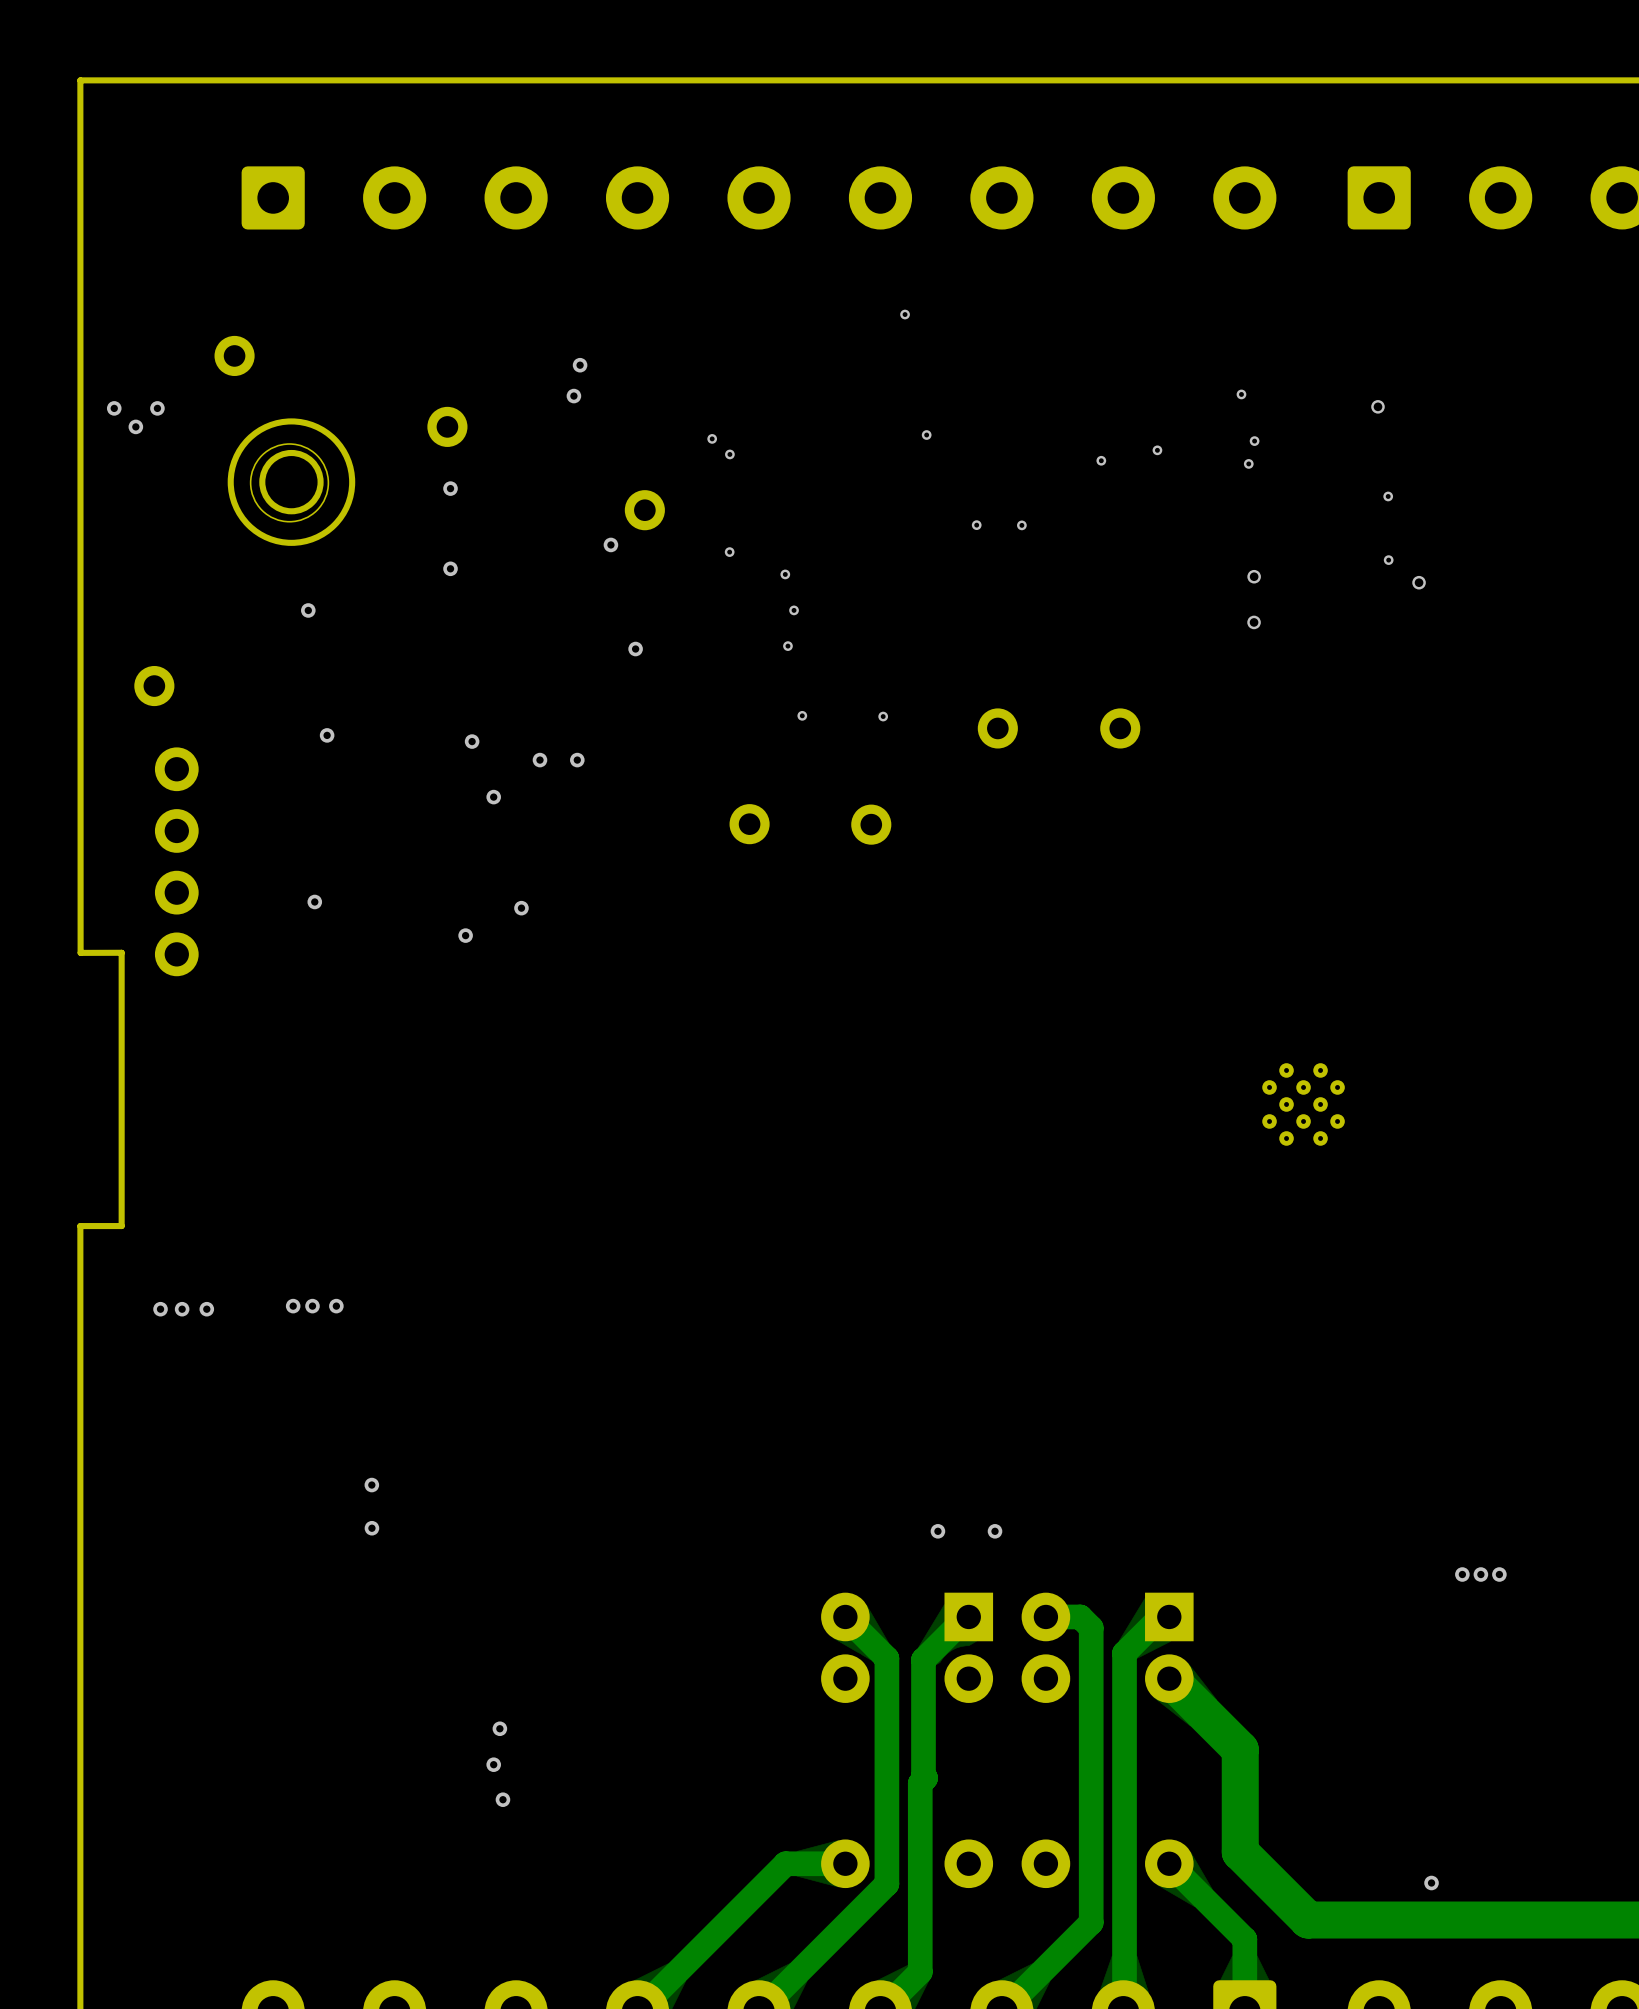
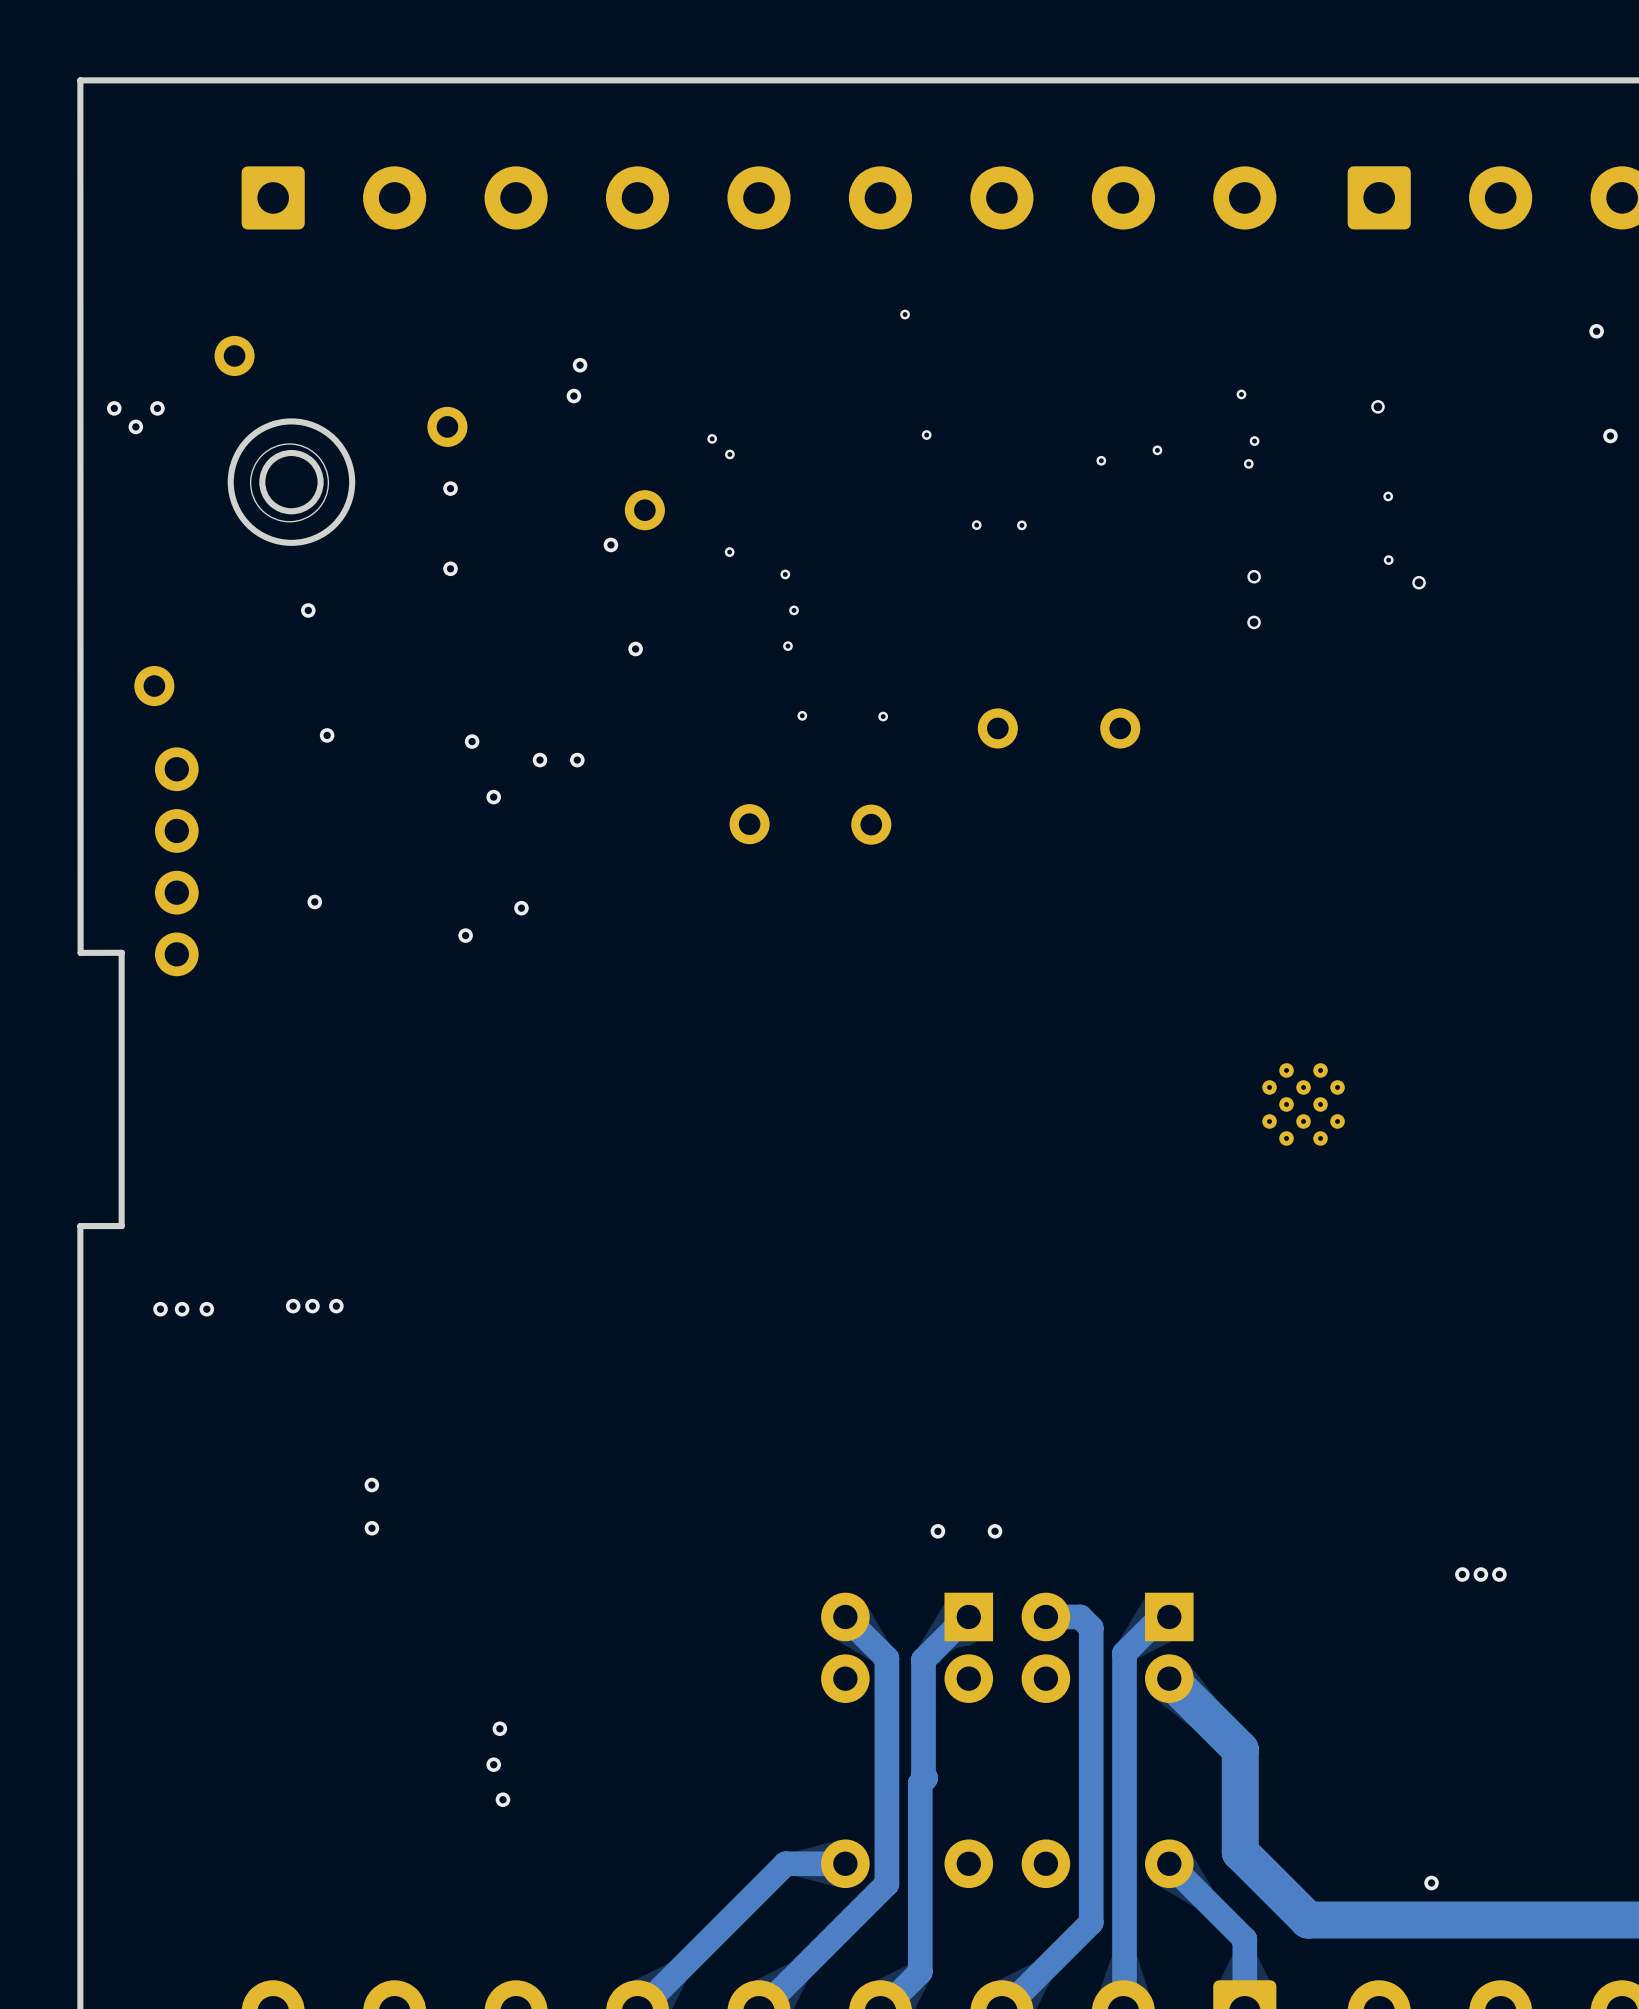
via: none -> (1596, 331)
via: none -> (1610, 435)

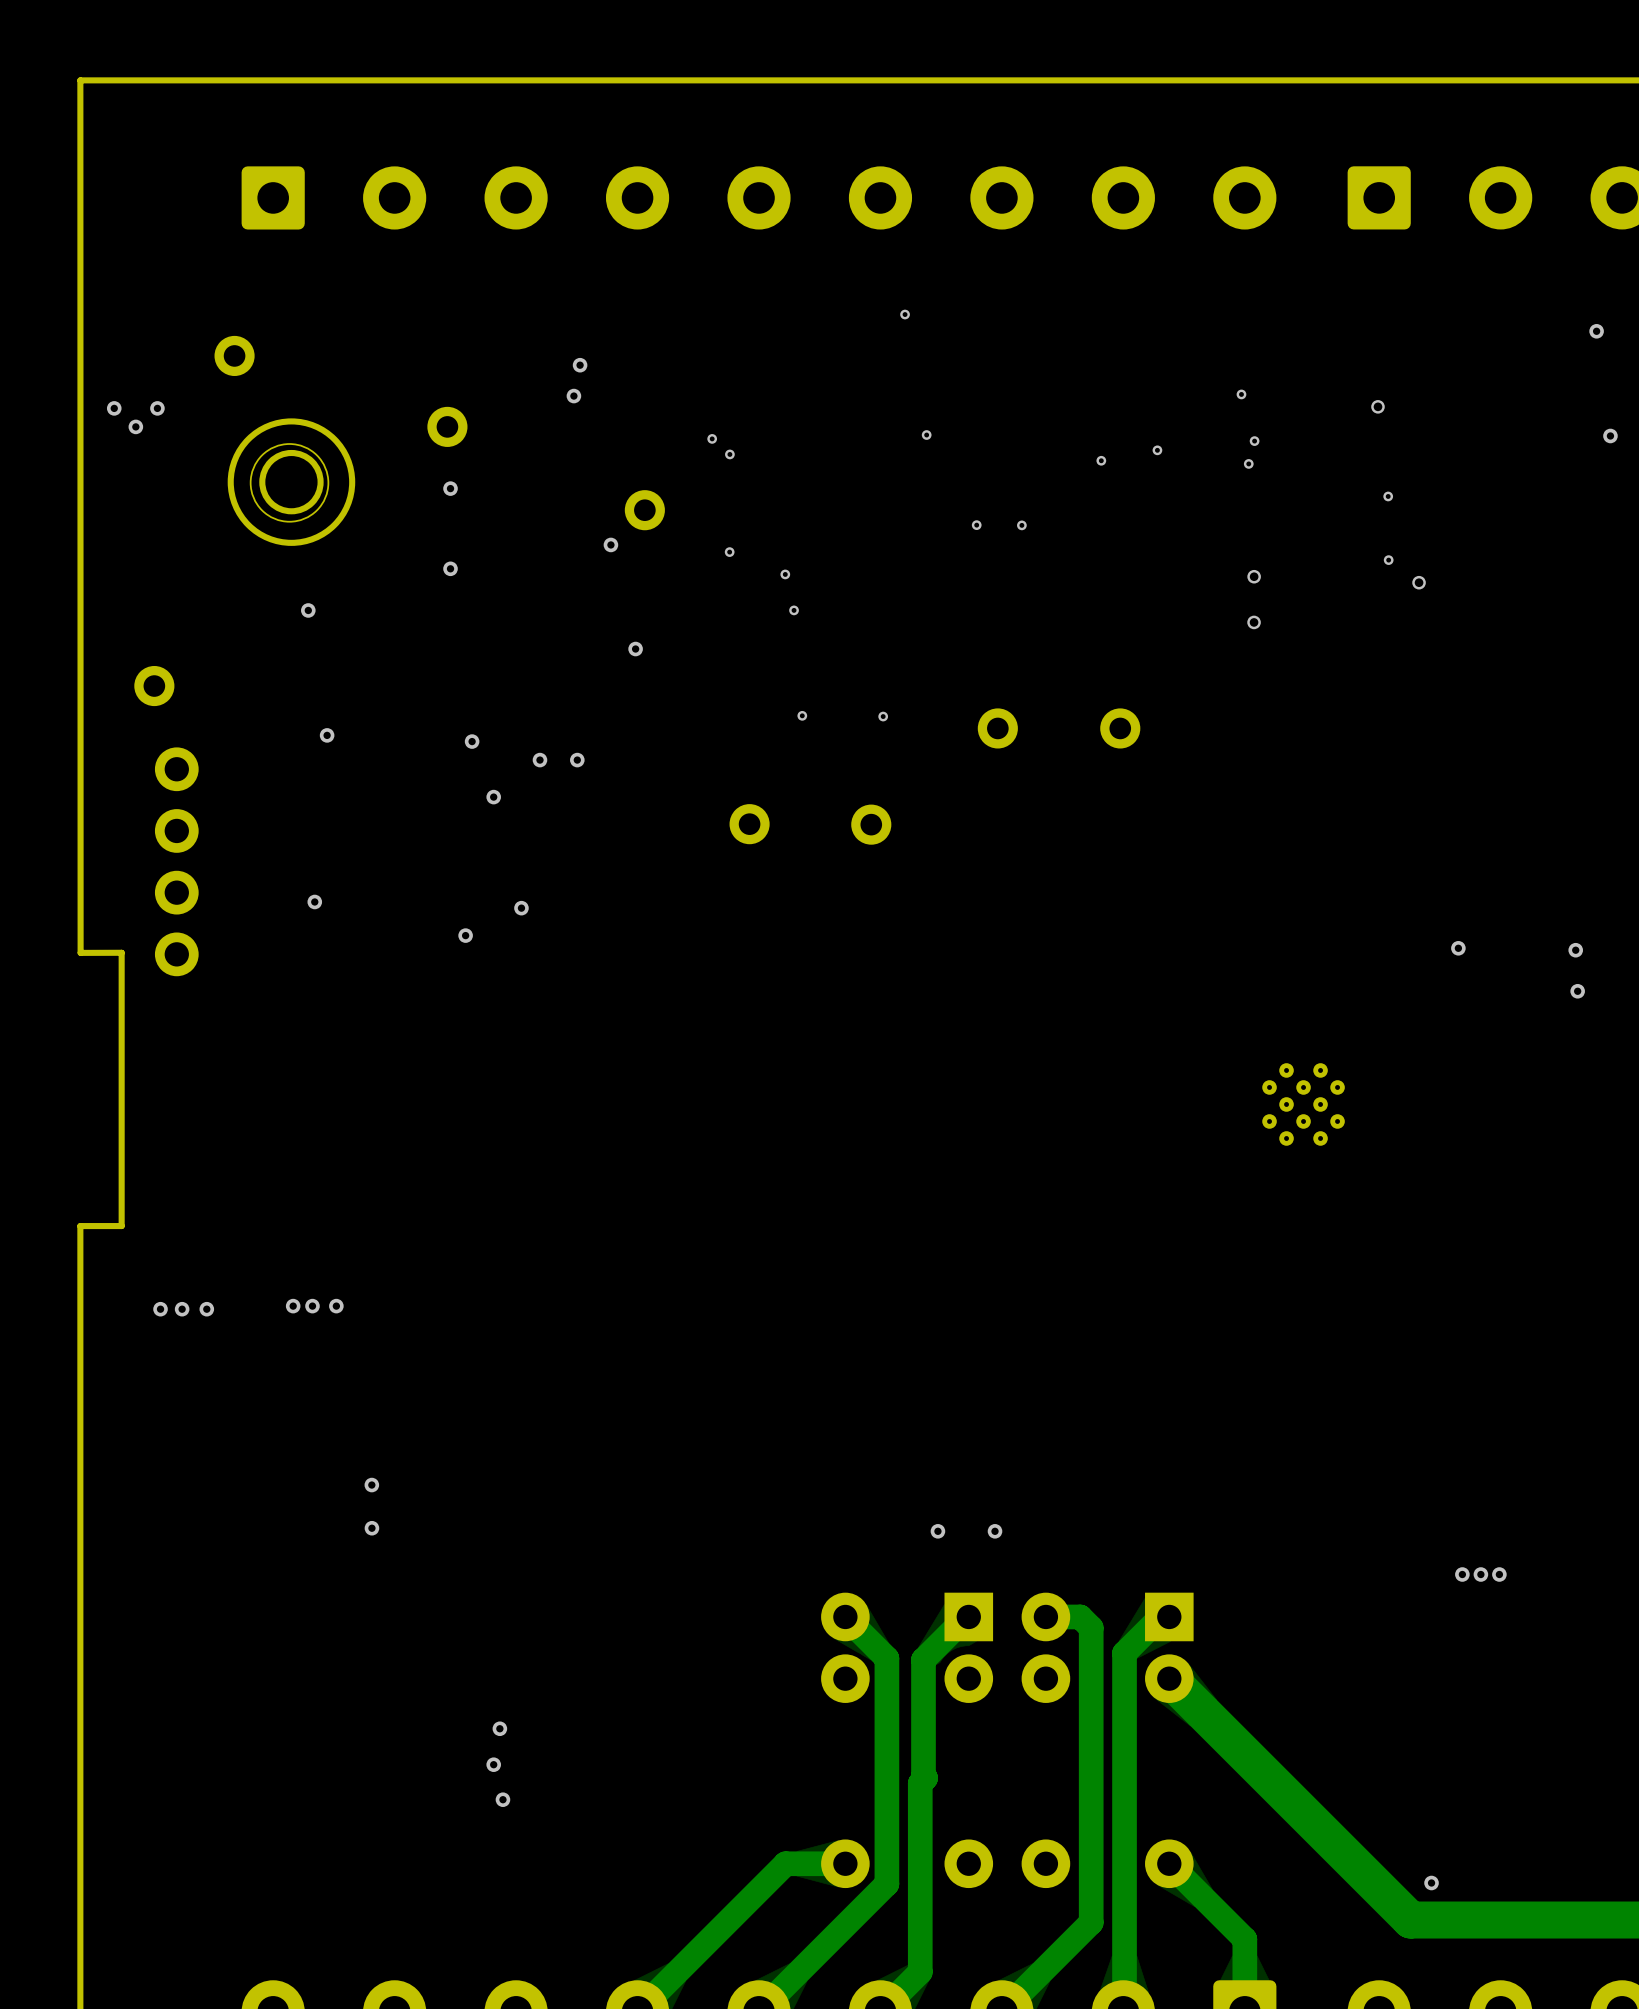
via: (787, 646) -> none
via: none -> (1458, 948)
via: none -> (1575, 950)
via: none -> (1577, 991)
track: (1240, 1749) (1240, 1852) (1308, 1920) (1410, 1920) -> (1240, 1749) (1410, 1920)

